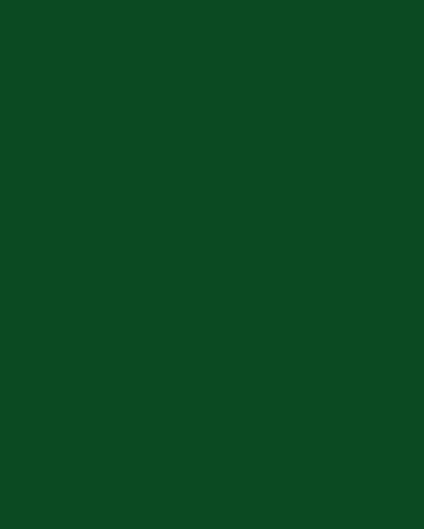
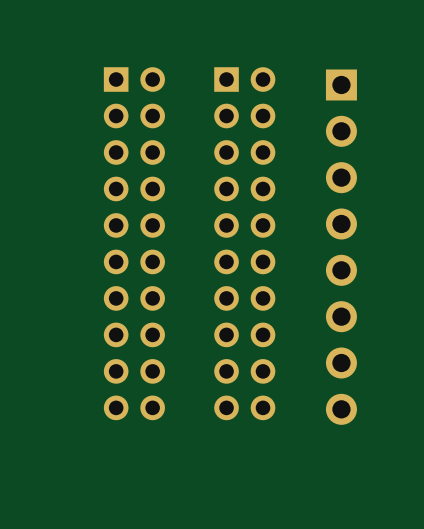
part: none -> (134, 243)
part: none -> (244, 243)
part: none -> (341, 247)

